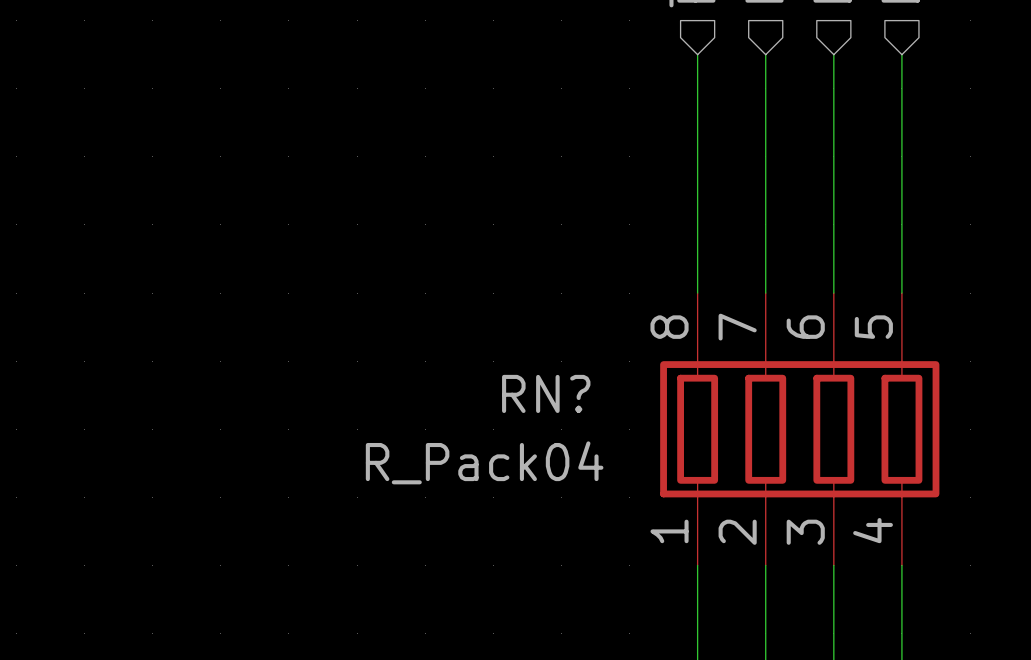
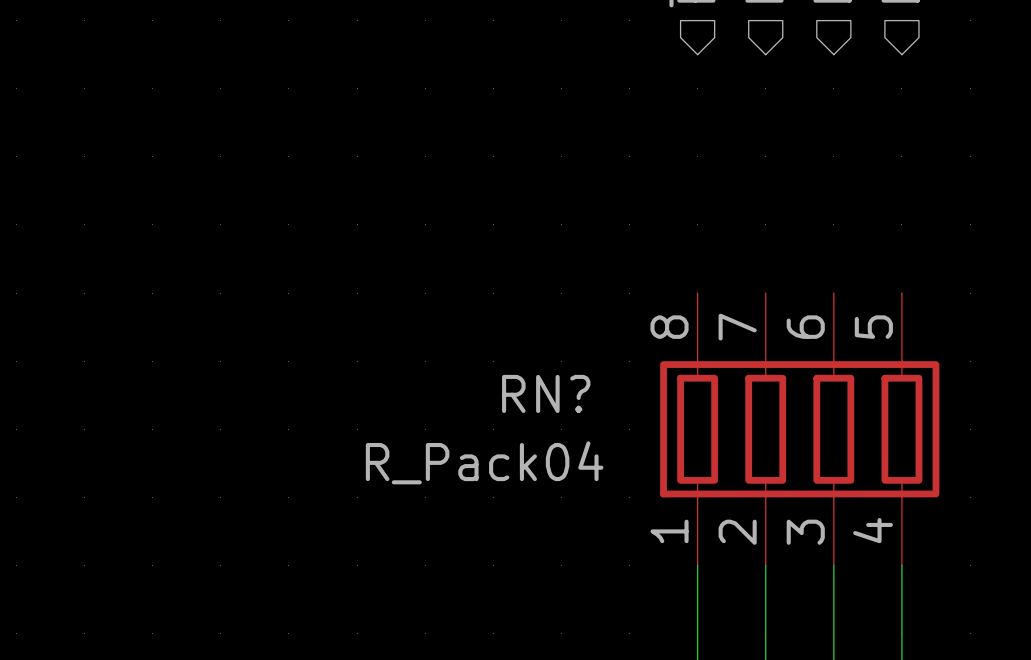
wire: (697, 54) (697, 293) -> none
wire: (765, 54) (765, 293) -> none
wire: (833, 54) (833, 293) -> none
wire: (901, 54) (901, 293) -> none

